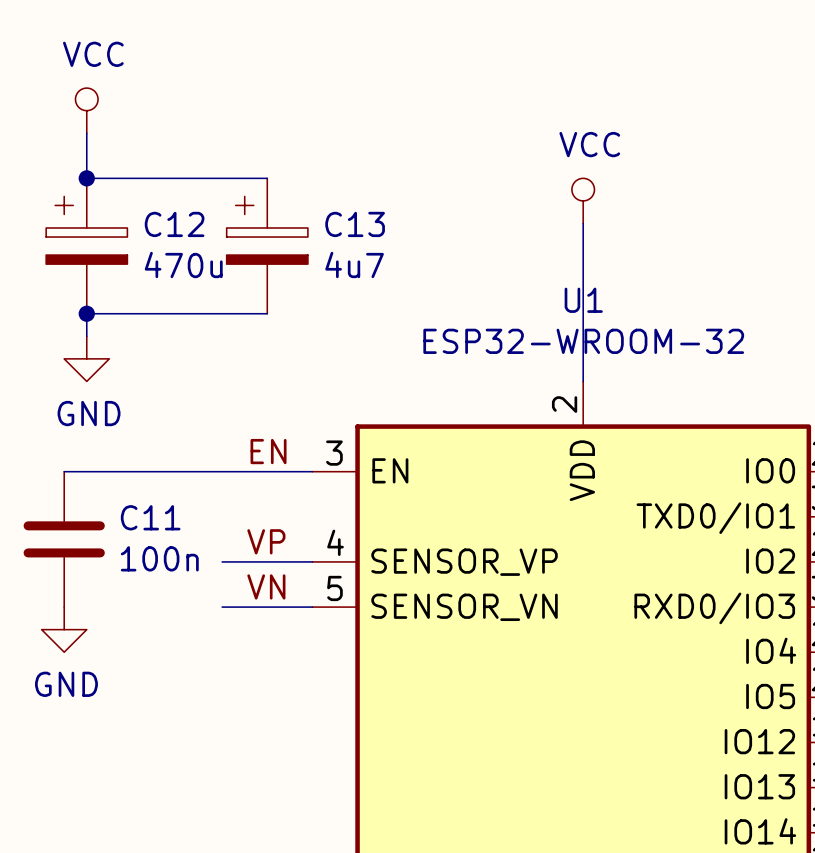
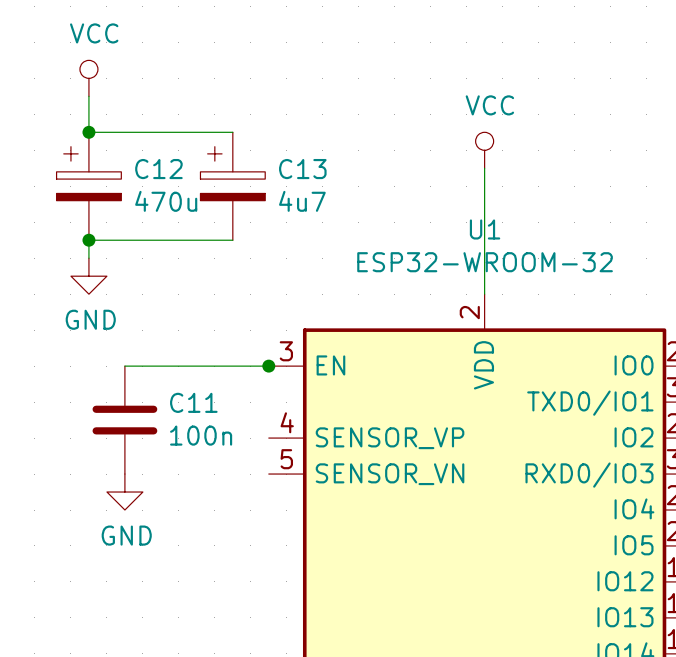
label: EN (268, 451) -> none
wire: (64, 471) (131, 471) -> none
junction: none -> (268, 366)
C11 position: (64, 539) -> (124, 420)
label: VP (266, 541) -> none
wire: (222, 561) (312, 561) -> none
label: VN (266, 586) -> none
wire: (222, 607) (312, 607) -> none
power symbol position: GND (64, 629) -> GND (124, 492)

